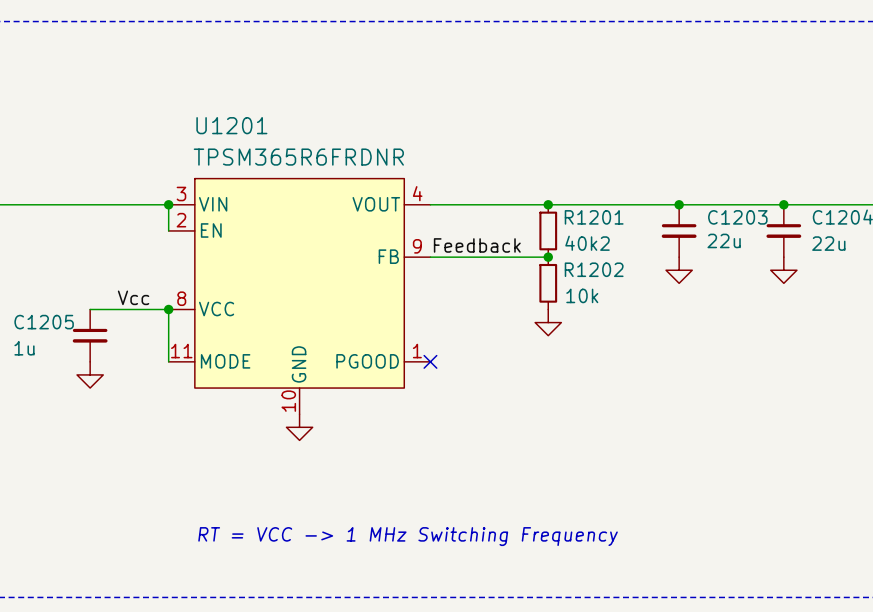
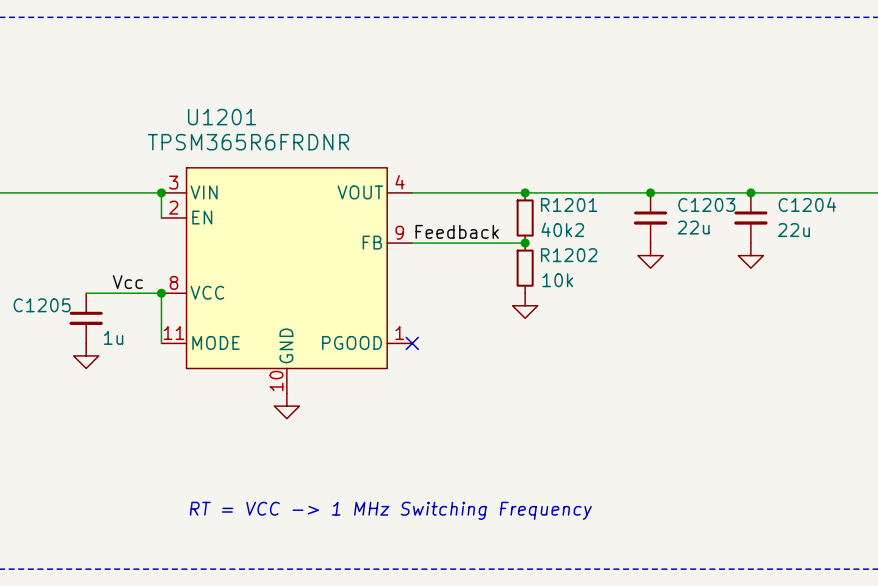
U1201 value position: TPSM365R6FRDNR (298, 157) -> TPSM365R6FRDNR (248, 142)
C1205 value position: 1u (24, 348) -> 1u (113, 337)

